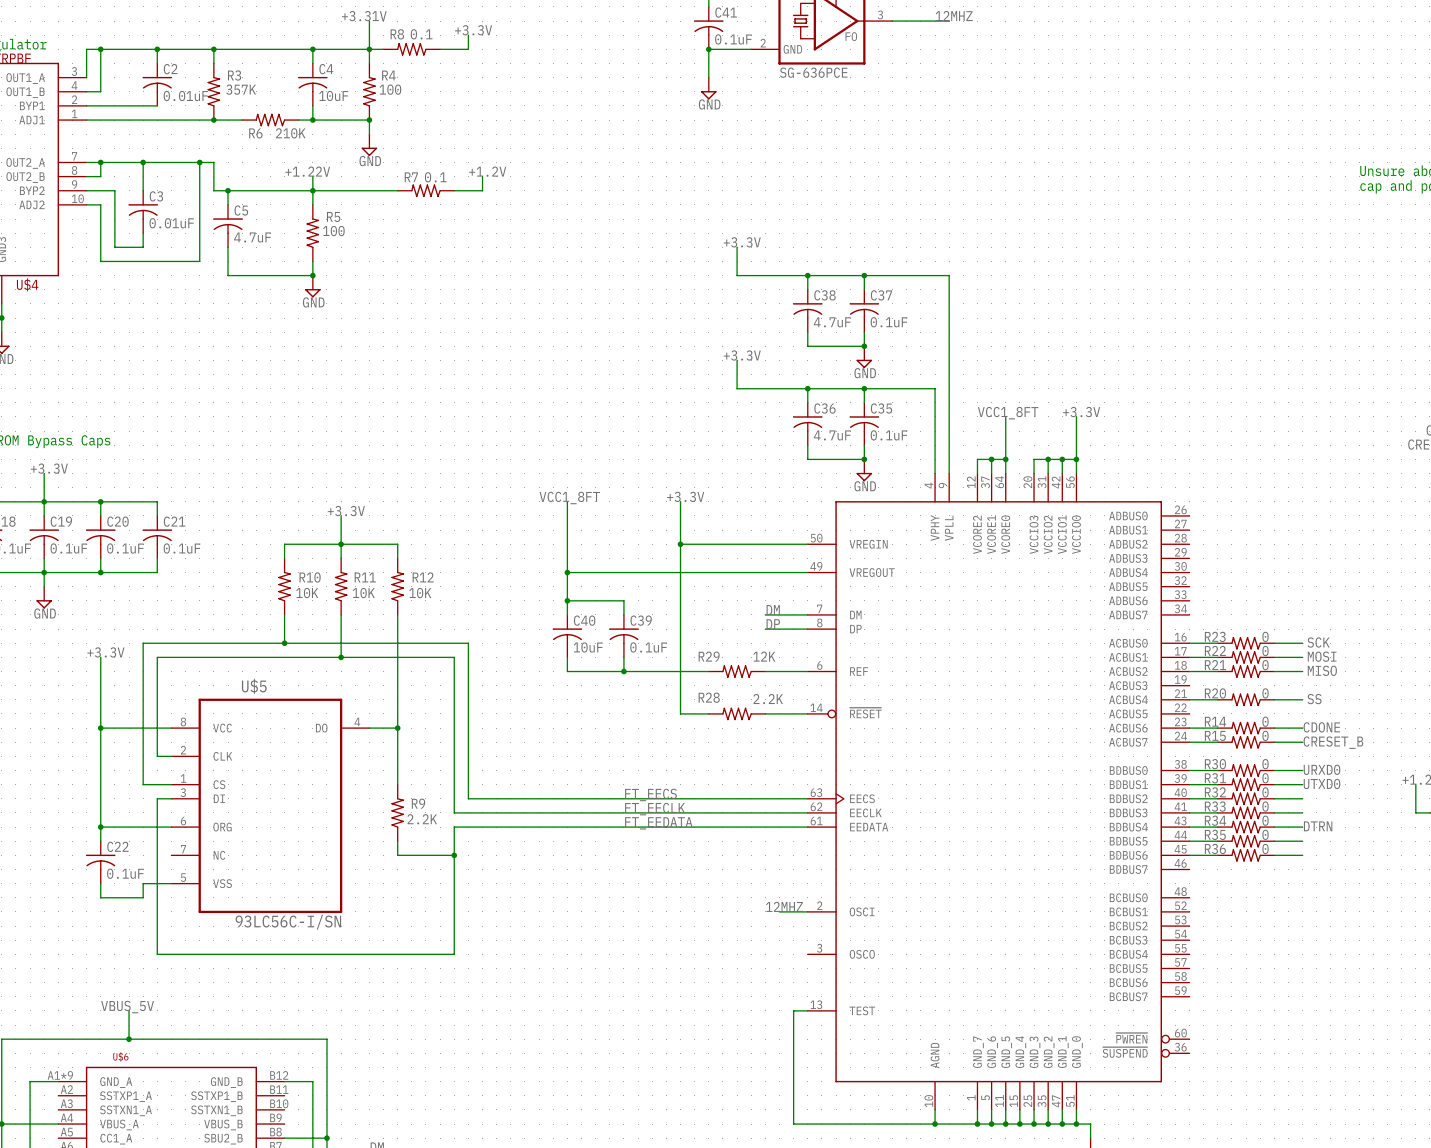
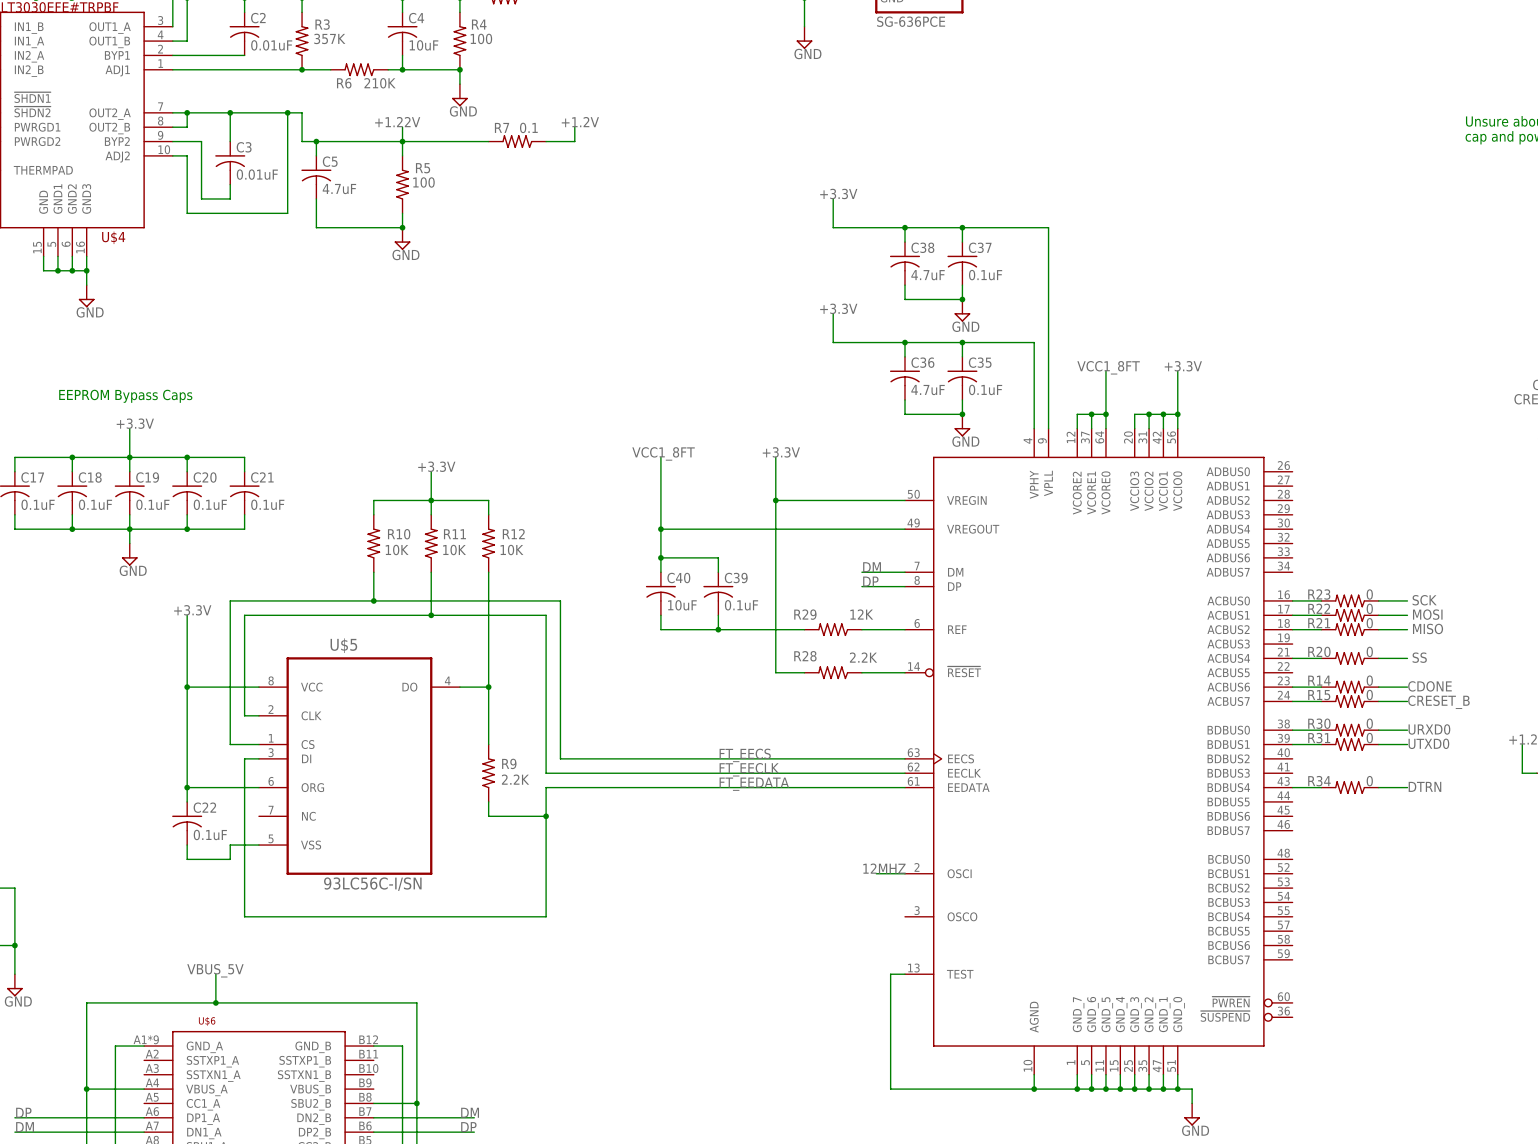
wire: (1189, 798) (1217, 798) -> none
R32: 0 (1246, 798) -> none
wire: (1274, 798) (1302, 798) -> none
wire: (1189, 812) (1217, 812) -> none
R33: 0 (1246, 812) -> none
wire: (1274, 812) (1302, 812) -> none
wire: (1189, 841) (1217, 841) -> none
R35: 0 (1246, 841) -> none
wire: (1274, 841) (1302, 841) -> none
wire: (1189, 855) (1217, 855) -> none
R36: 0 (1246, 855) -> none
wire: (1274, 855) (1302, 855) -> none

